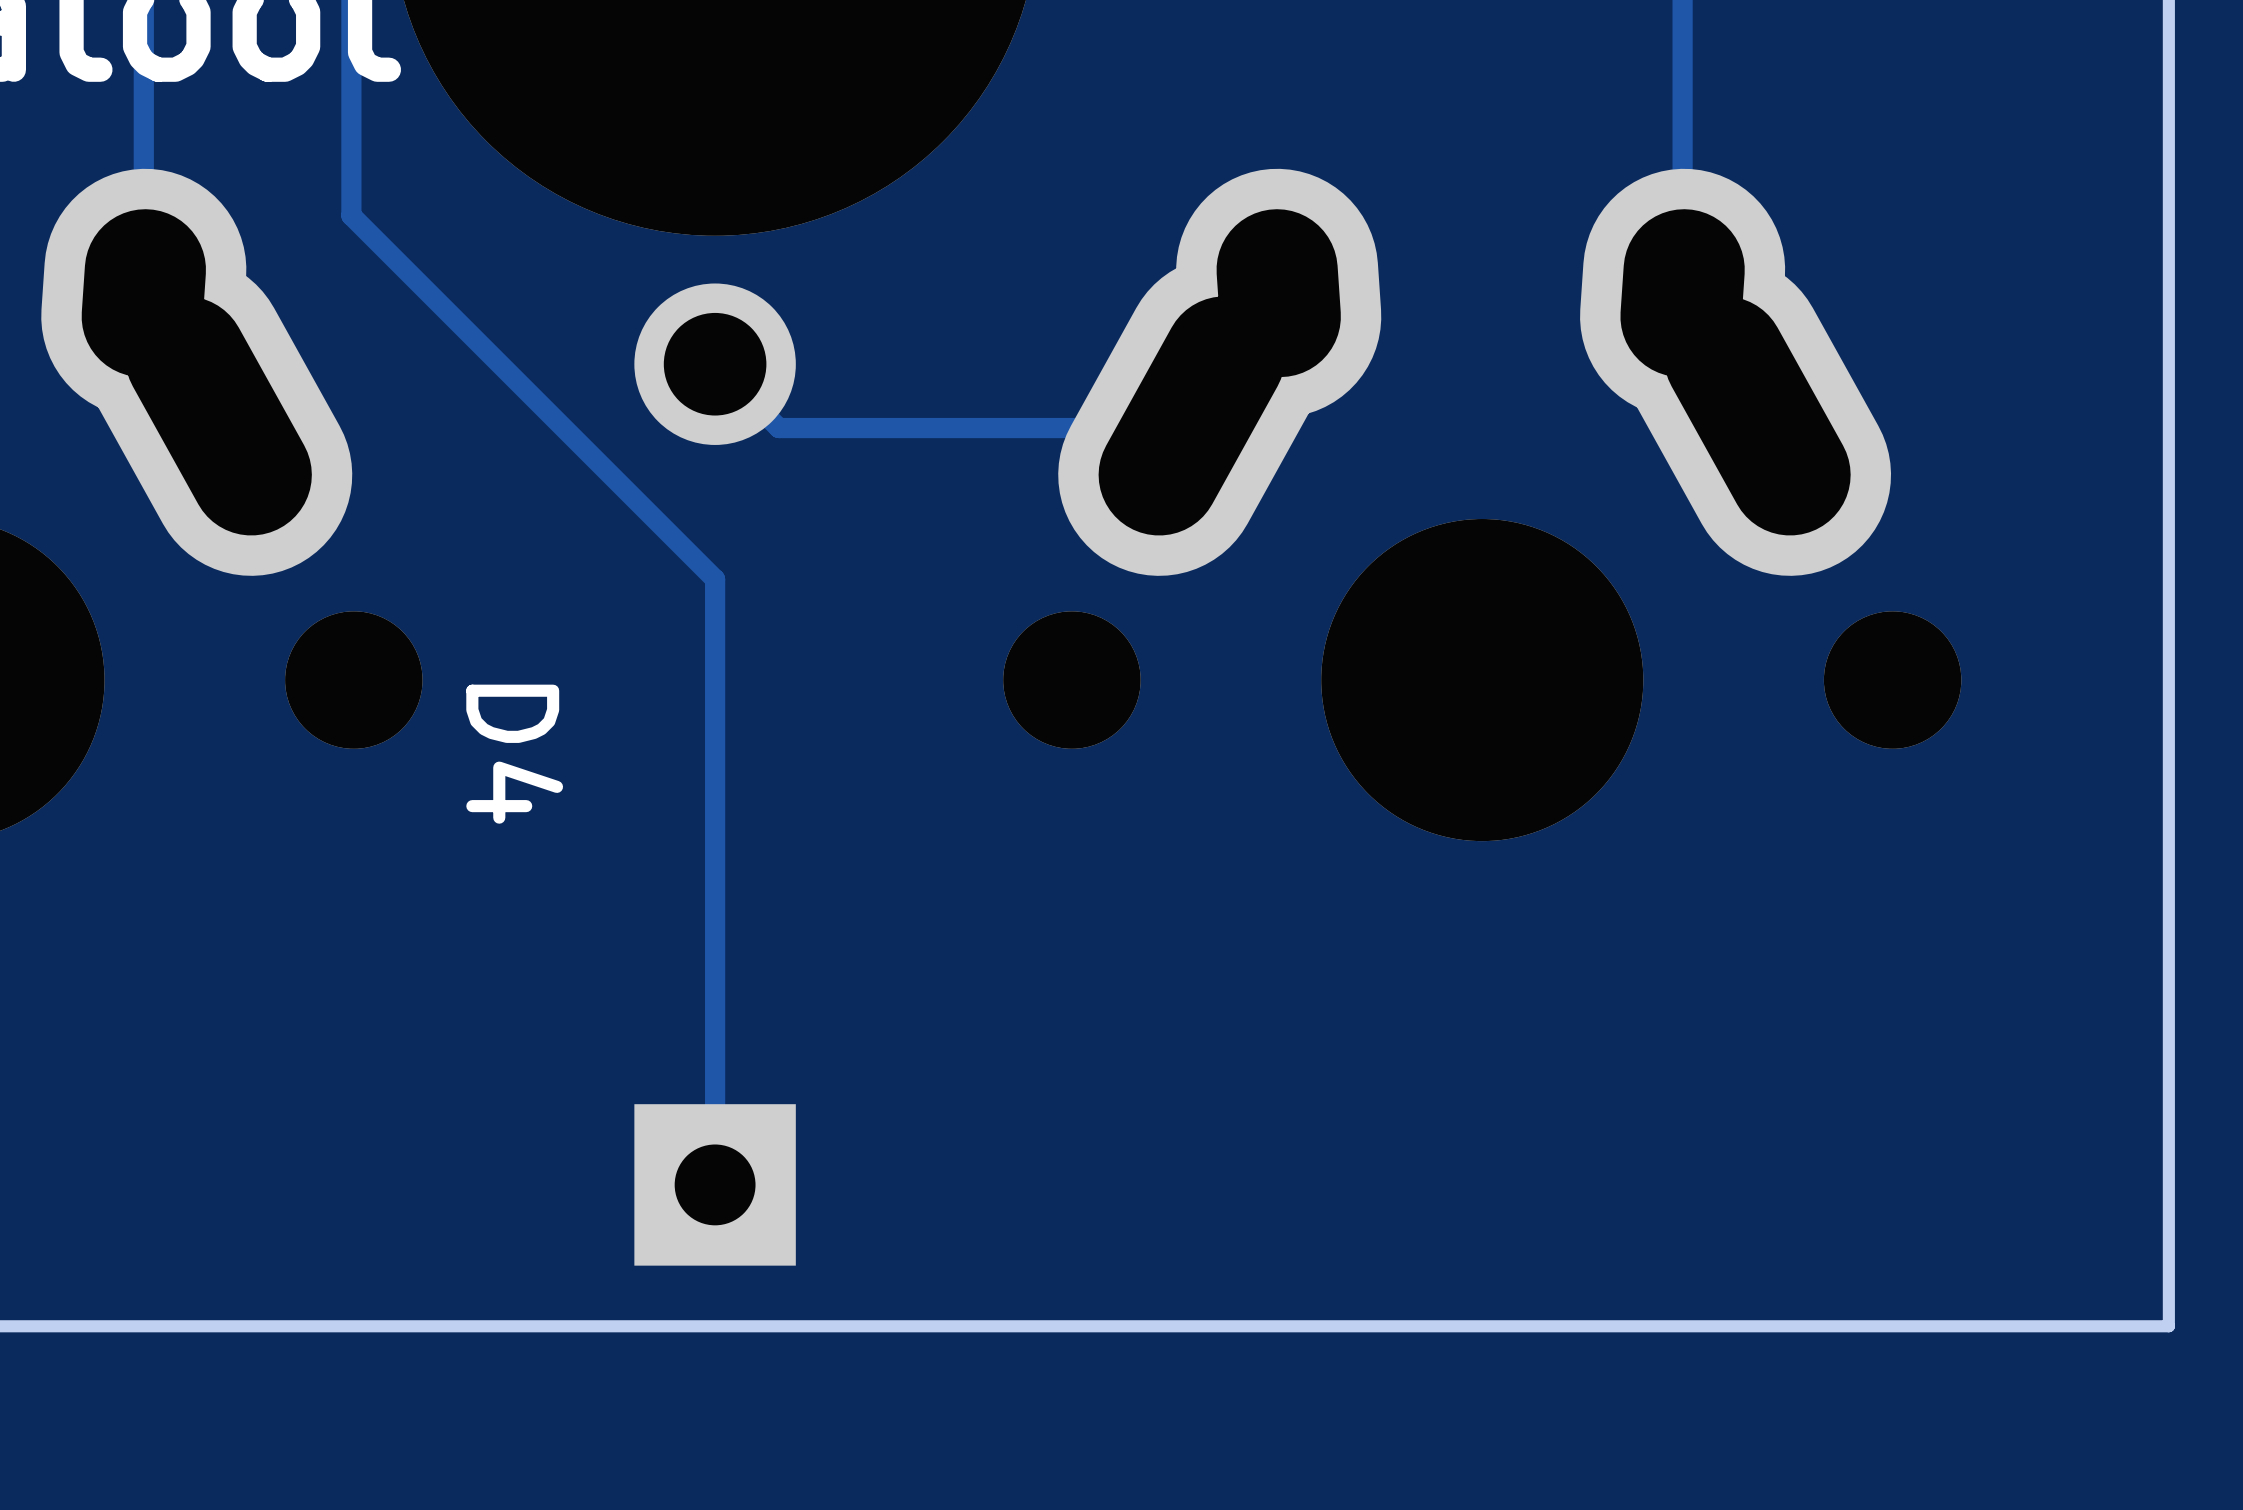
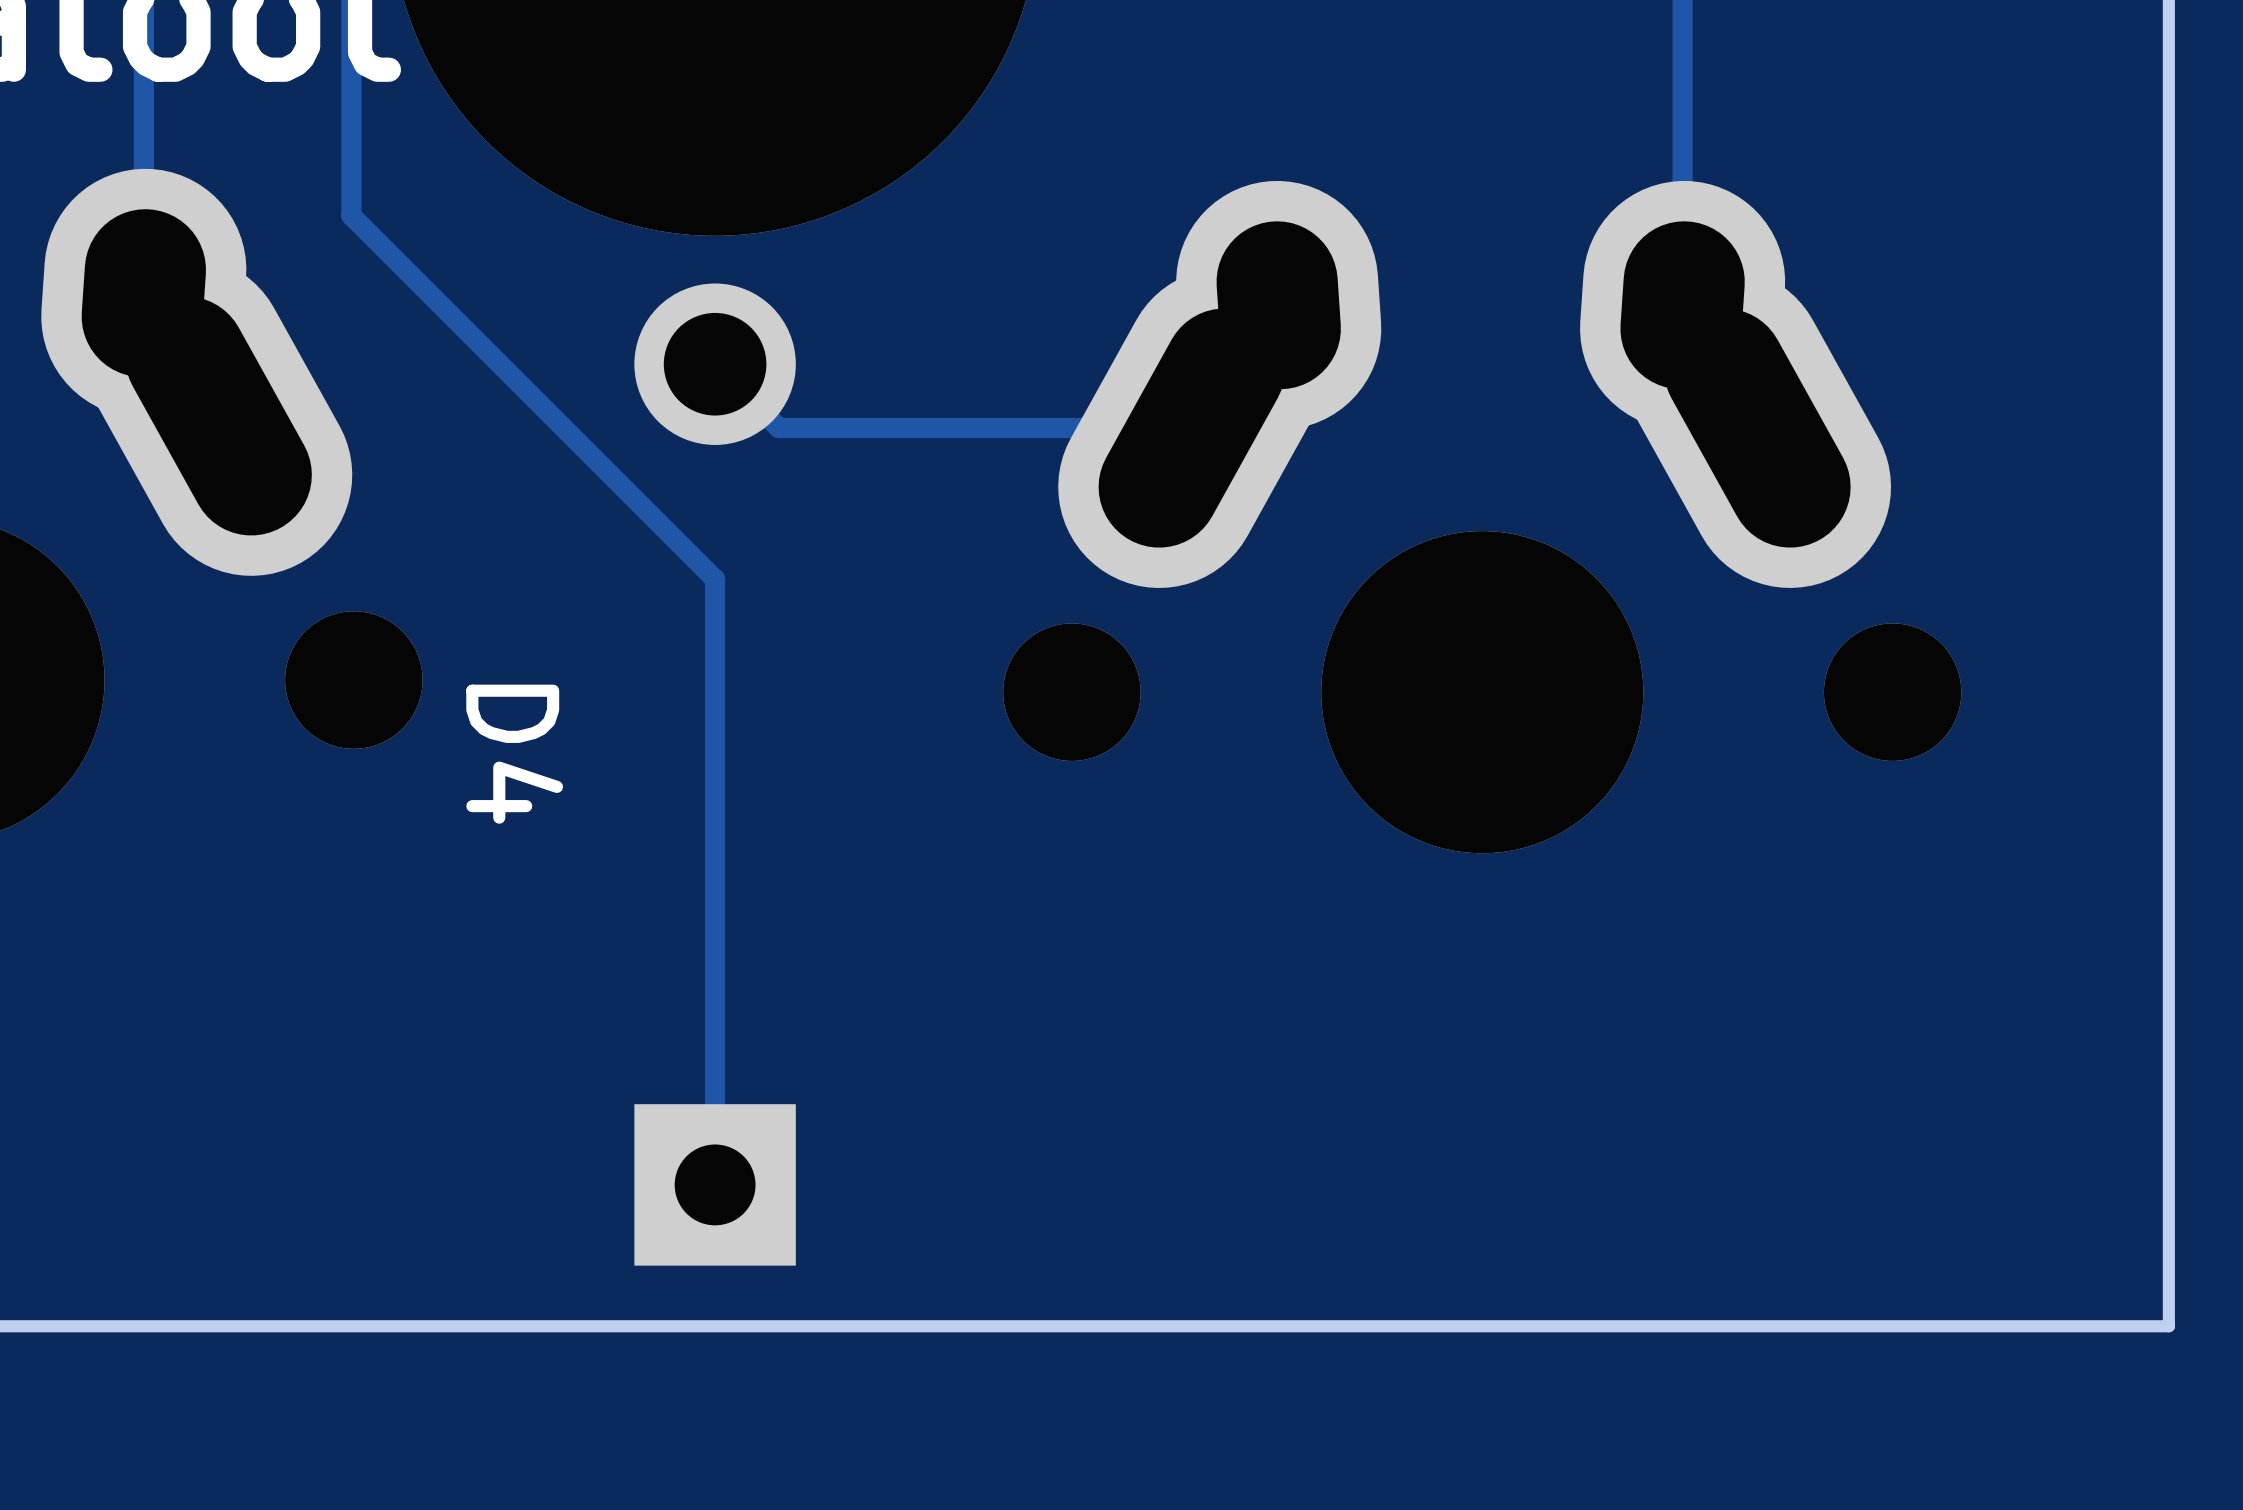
part position: (1482, 504) -> (1482, 517)

